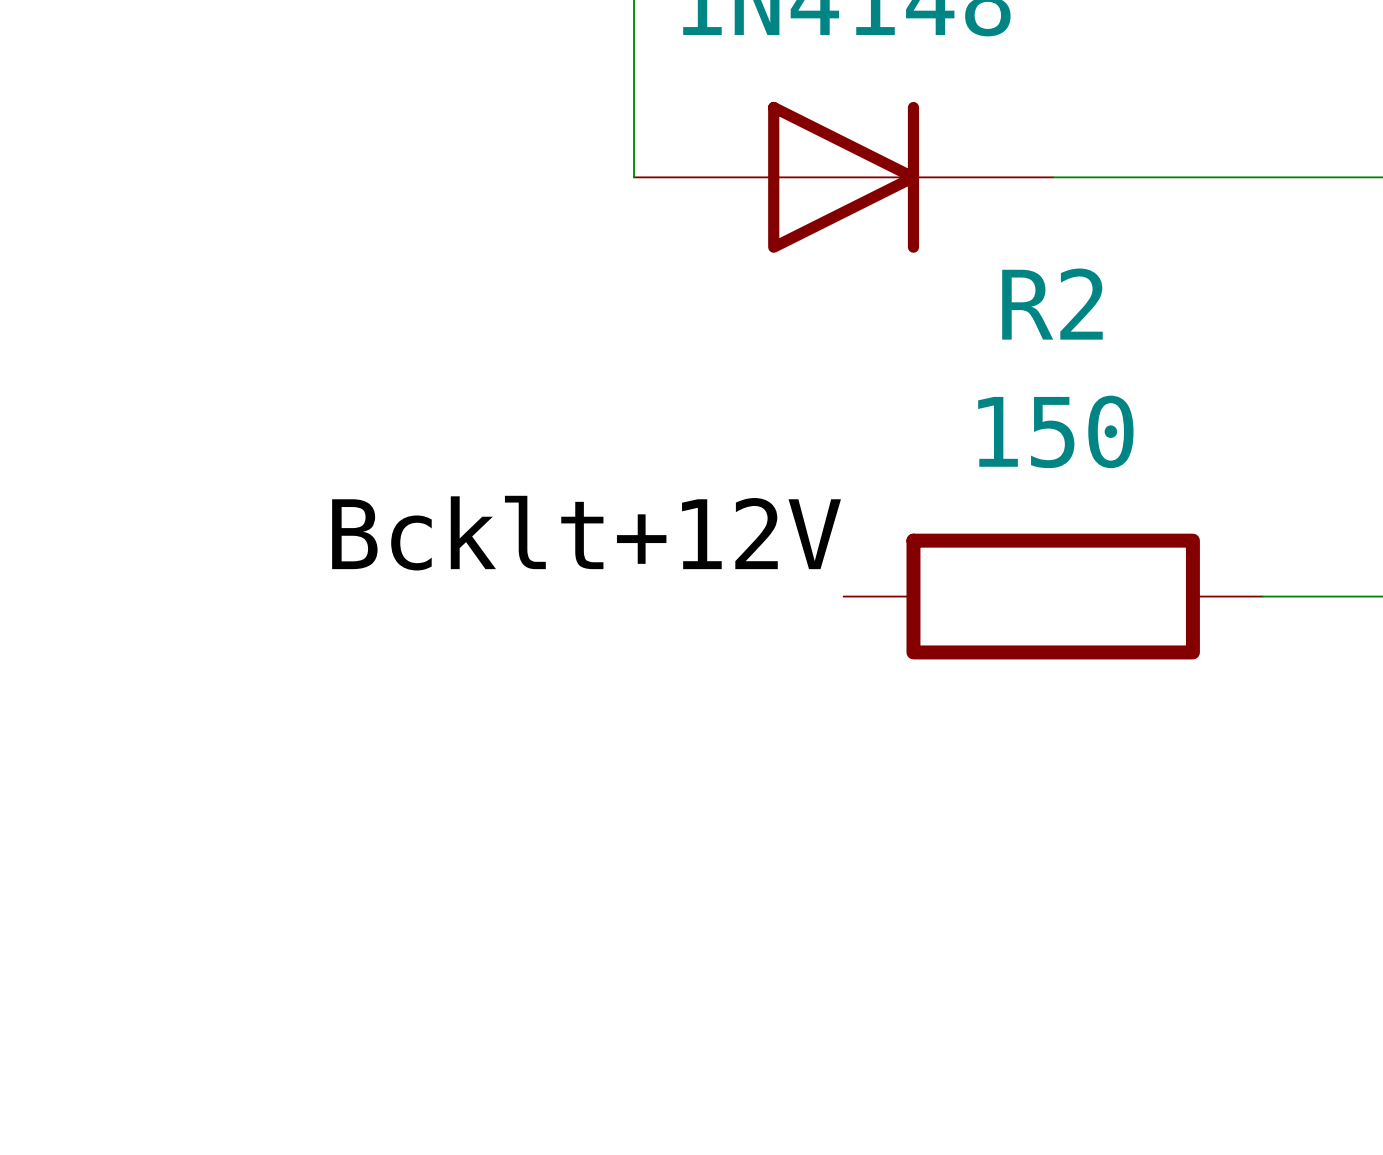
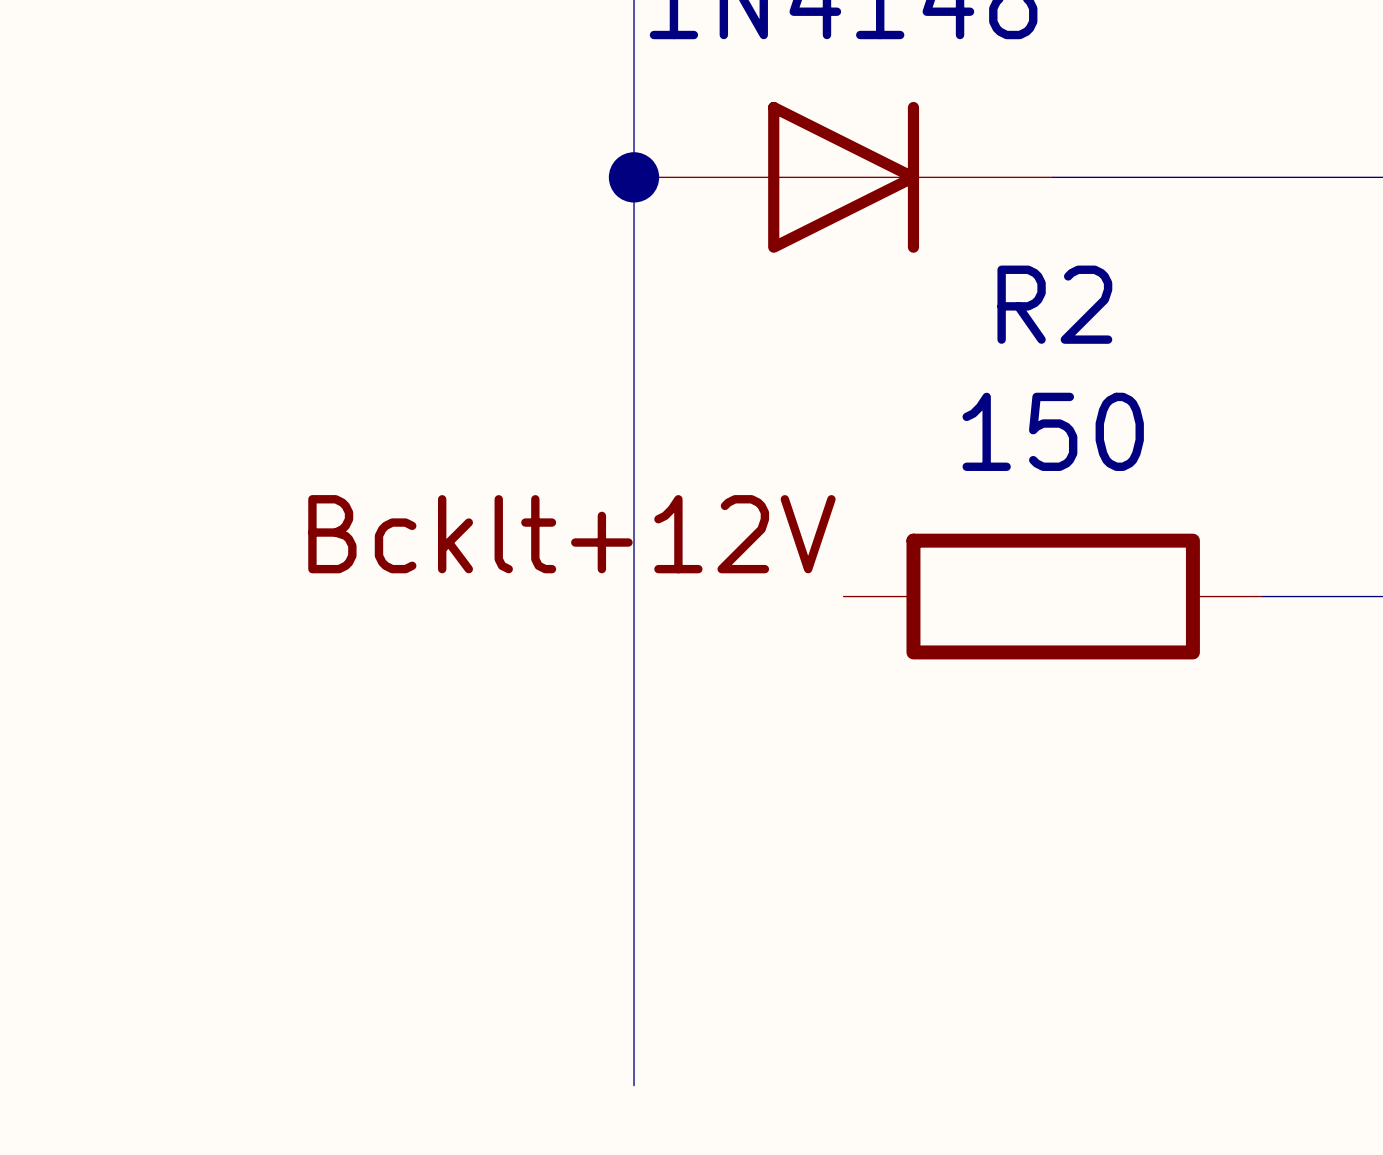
wire: none -> (634, 177) (634, 1085)
junction: none -> (634, 177)

